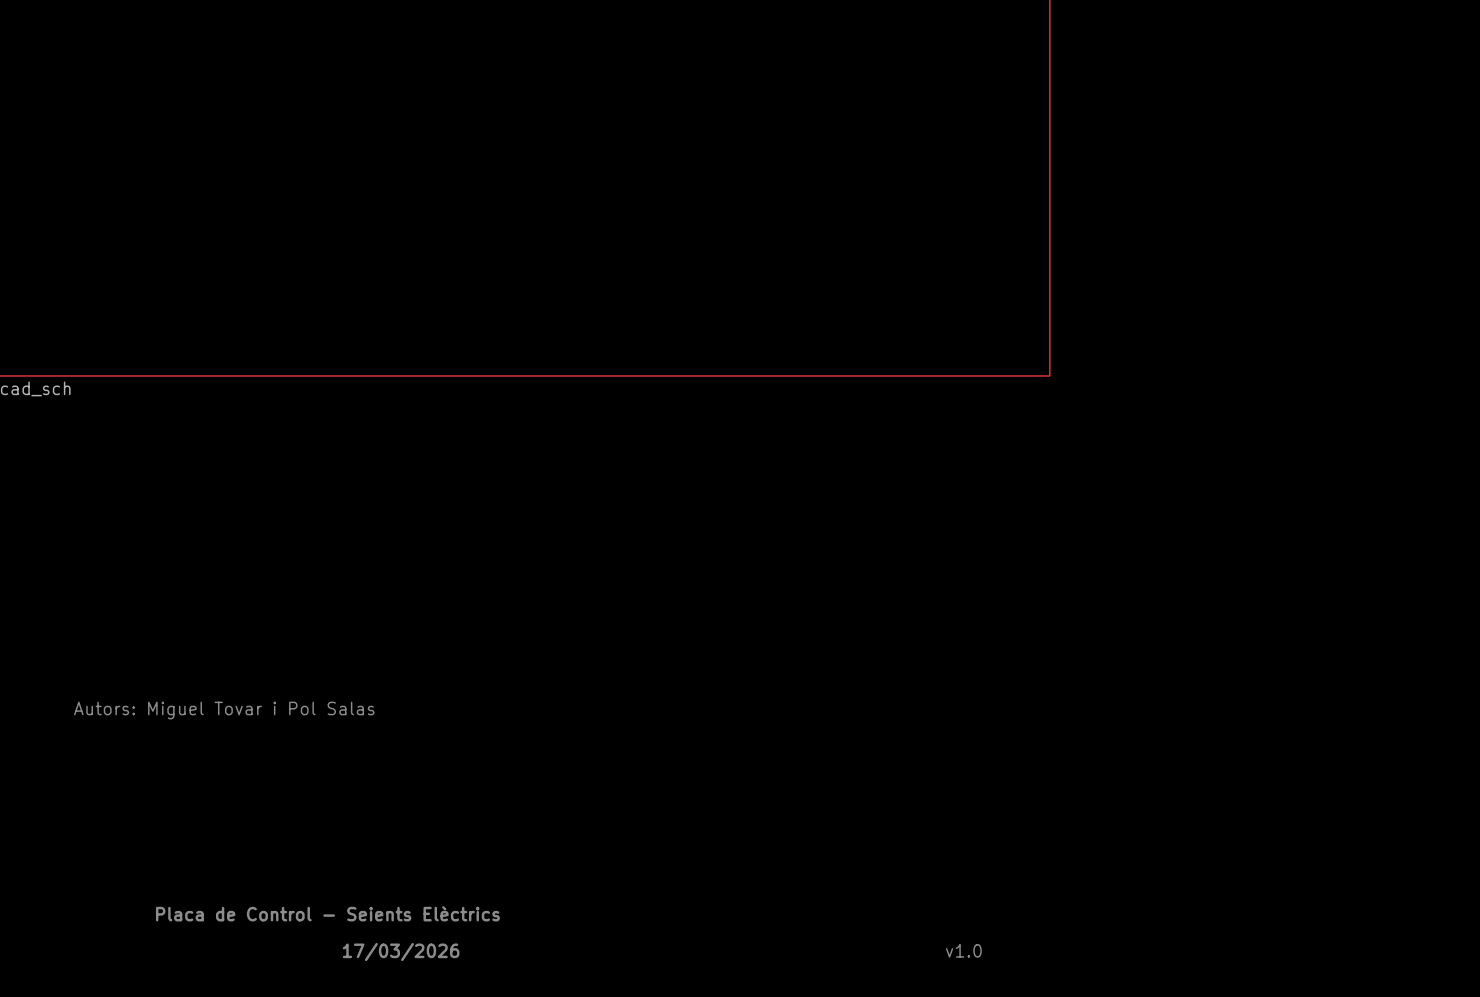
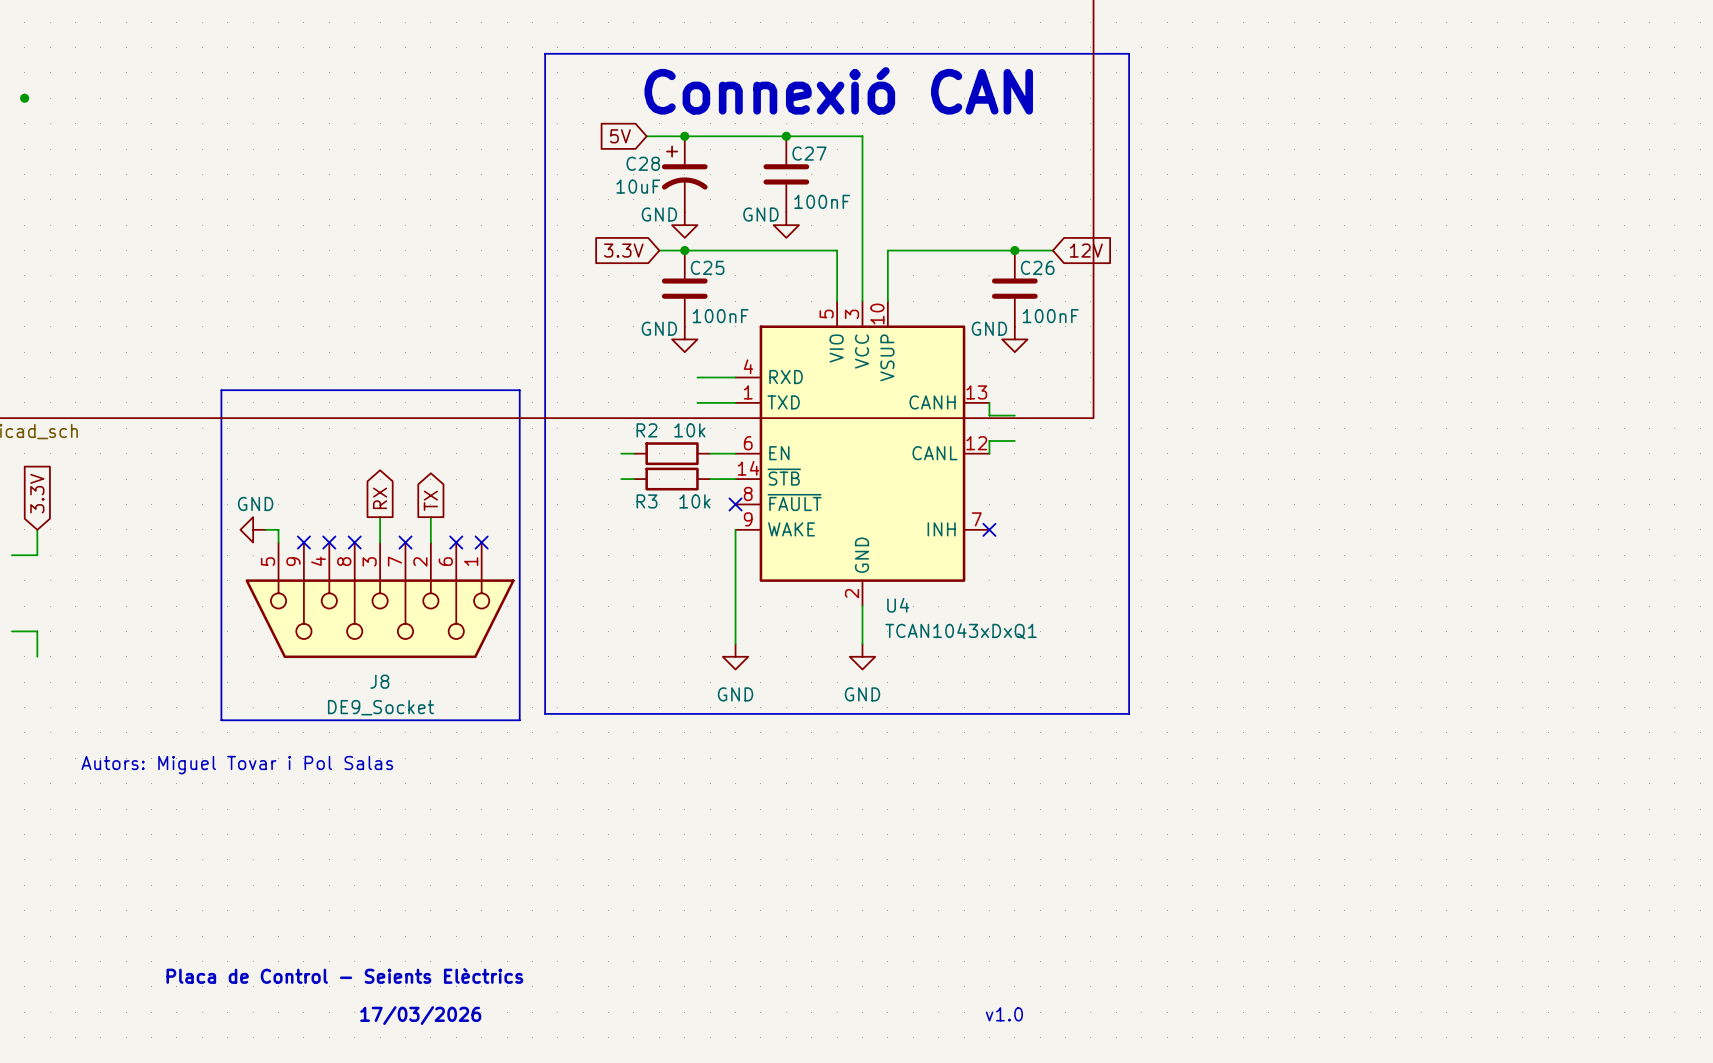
line: none -> (545, 53) (545, 713) (1129, 713) (1129, 53) (545, 53)
text: none -> Connexió CAN (838, 90)
junction: none -> (24, 98)
global label: none -> 5V (620, 136)
wire: none -> (646, 136) (862, 136) (862, 301)
junction: none -> (684, 136)
junction: none -> (786, 136)
C28: none -> 10uF (684, 174)
C27: none -> 100nF (786, 174)
power symbol: none -> GND (684, 225)
power symbol: none -> GND (786, 225)
global label: none -> 3.3V (623, 250)
wire: none -> (659, 250) (837, 250) (837, 301)
junction: none -> (684, 250)
junction: none -> (1014, 250)
wire: none -> (1052, 250) (887, 250) (887, 301)
global label: none -> 12V (1086, 250)
C25: none -> 100nF (684, 288)
C26: none -> 100nF (1014, 288)
power symbol: none -> GND (684, 339)
power symbol: none -> GND (1014, 339)
wire: none -> (697, 377) (735, 377)
line: none -> (221, 390) (519, 390) (519, 720) (221, 720) (221, 390)
wire: none -> (697, 402) (735, 402)
wire: none -> (989, 402) (989, 415) (1014, 415)
wire: none -> (1014, 440) (989, 440) (989, 453)
wire: none -> (621, 453) (633, 453)
R2: none -> 10k (672, 453)
wire: none -> (710, 453) (735, 453)
U4: none -> TCAN1043xDxQ1 (862, 453)
wire: none -> (621, 479) (633, 479)
R3: none -> 10k (672, 479)
wire: none -> (710, 479) (735, 479)
global label: none -> 3.3V (37, 493)
global label: none -> RX (380, 498)
global label: none -> TX (430, 500)
no-connect mark: none -> (735, 504)
wire: none -> (380, 517) (380, 542)
wire: none -> (430, 517) (430, 542)
wire: none -> (37, 529) (37, 555) (11, 555)
power symbol: none -> GND (253, 529)
wire: none -> (265, 529) (278, 529) (278, 542)
wire: none -> (735, 529) (735, 644)
no-connect mark: none -> (989, 529)
no-connect mark: none -> (303, 542)
no-connect mark: none -> (329, 542)
no-connect mark: none -> (354, 542)
no-connect mark: none -> (405, 542)
no-connect mark: none -> (456, 542)
no-connect mark: none -> (481, 542)
J8: none -> DE9_Socket (380, 600)
wire: none -> (862, 606) (862, 644)
wire: none -> (11, 631) (37, 631) (37, 656)
power symbol: none -> GND (735, 656)
power symbol: none -> GND (862, 656)

